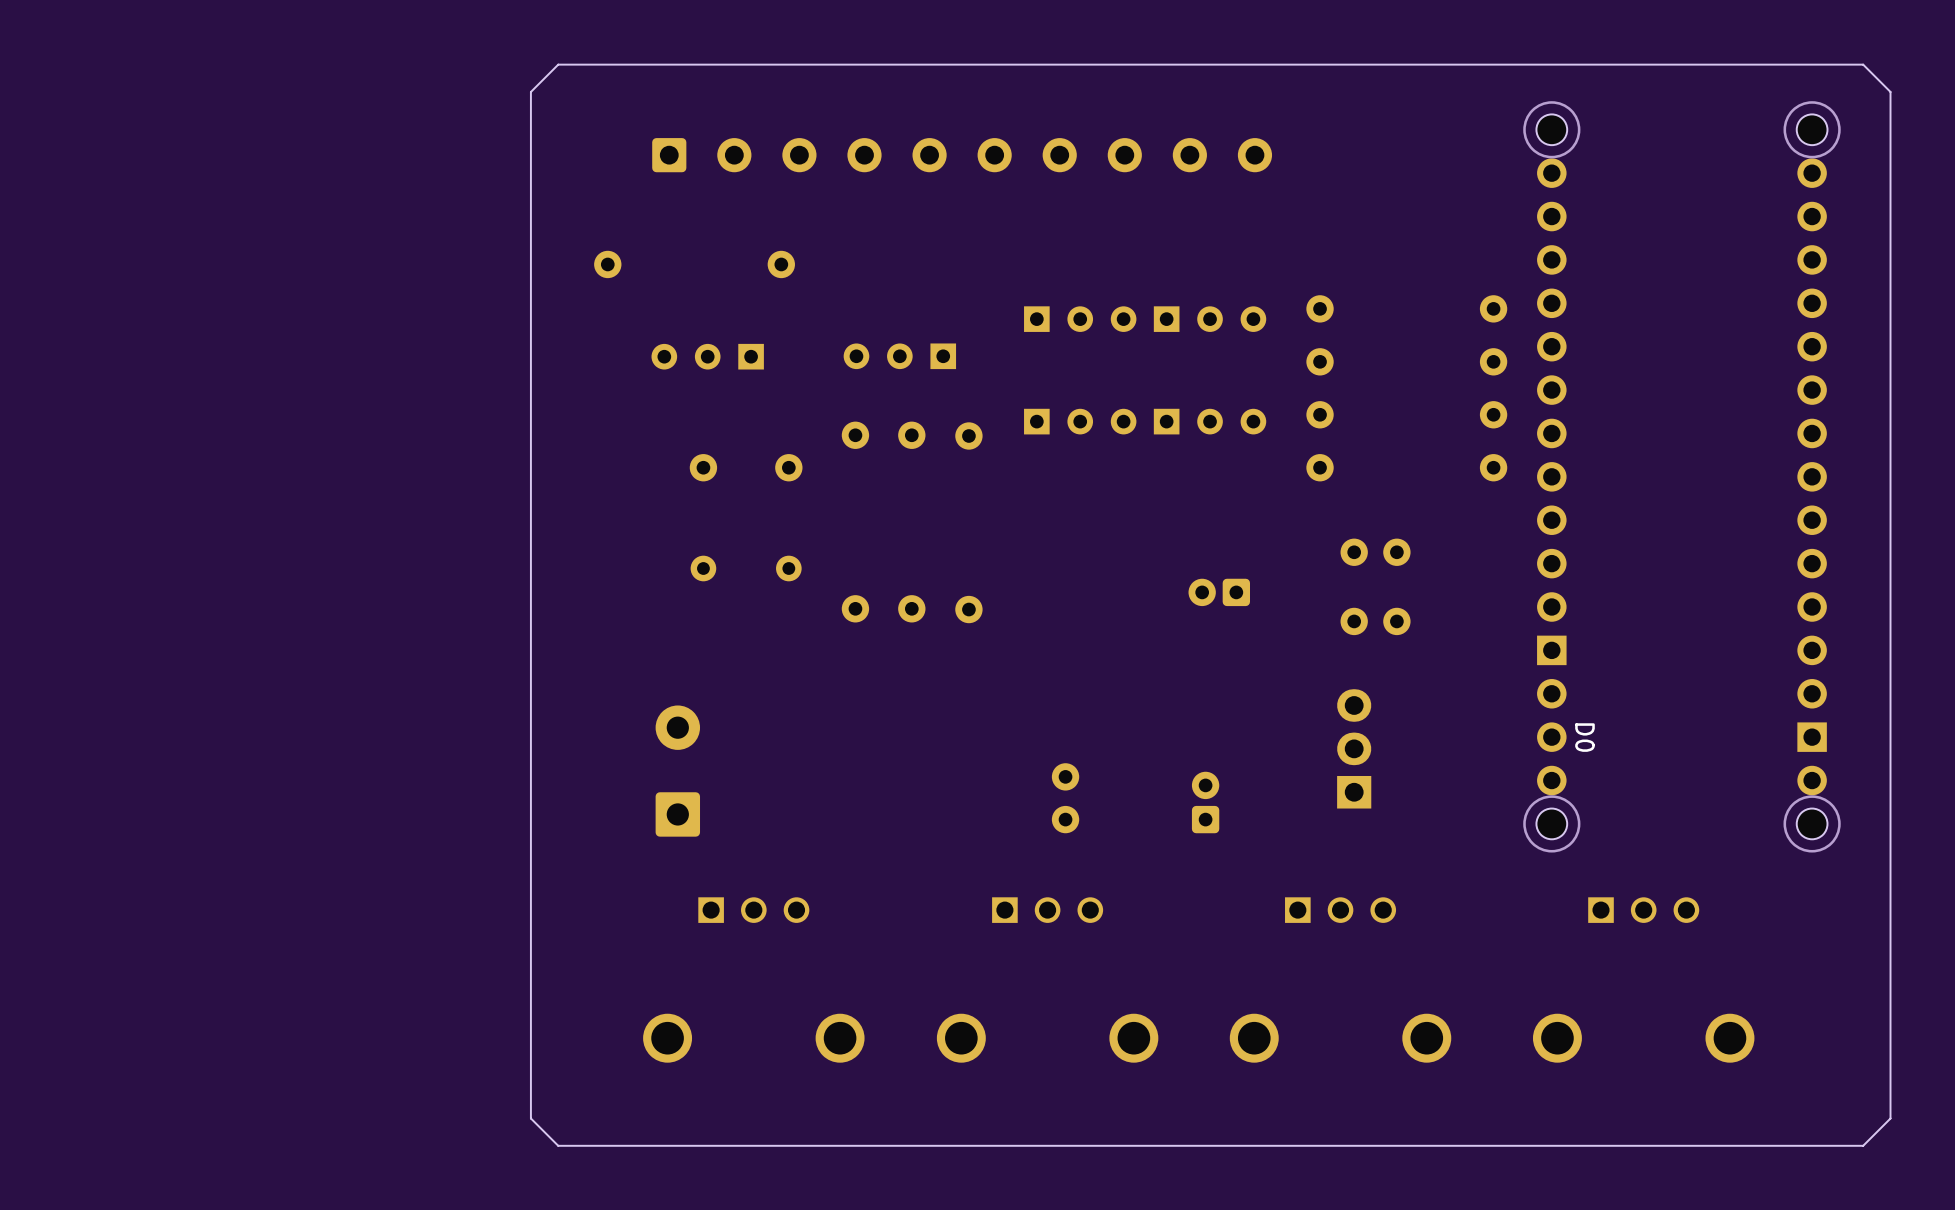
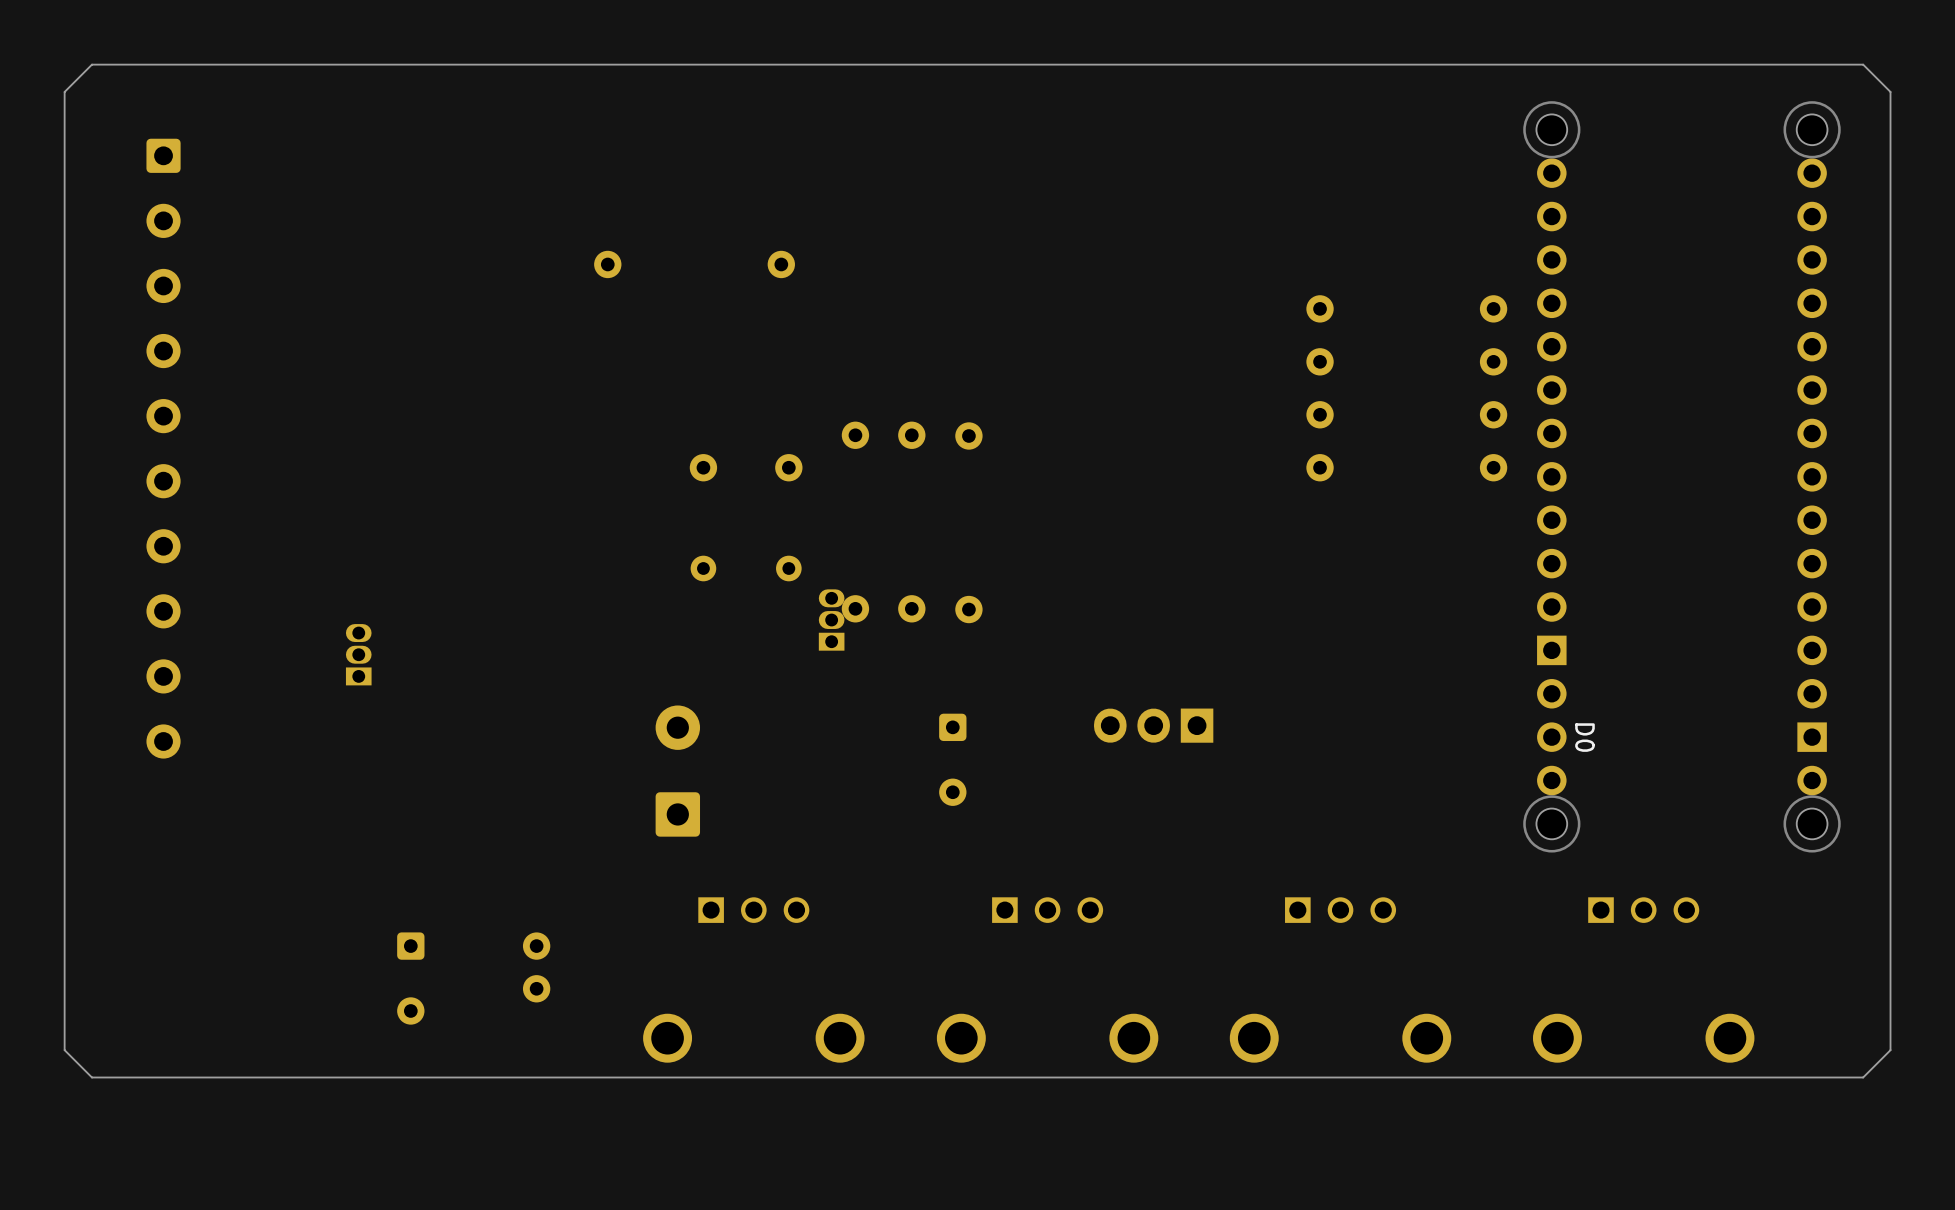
board edge: (558, 64) (530, 91) (530, 1118) (558, 1145) (1863, 1145) (1890, 1118) (1890, 1050) -> (558, 64) (91, 64) (64, 91) (64, 1050) (91, 1077) (1863, 1077) (1890, 1050)
part: (962, 155) -> none
part: (1080, 319) -> none
part: (1210, 319) -> none
part: (707, 356) -> none
part: (899, 356) -> none
part: (1080, 421) -> none
part: (1210, 421) -> none
part: none -> (163, 448)
part: (1375, 552) -> none
part: (1219, 592) -> none
part: none -> (831, 620)
part: (1375, 621) -> none
part: none -> (358, 654)
part rotation: 0° (1354, 748) -> 90° counterclockwise (1153, 725)
part position: (1354, 748) -> (1153, 725)
part: none -> (952, 759)
part: (1065, 798) -> none
part: (1205, 802) -> none
part: none -> (536, 967)
part: none -> (410, 978)

